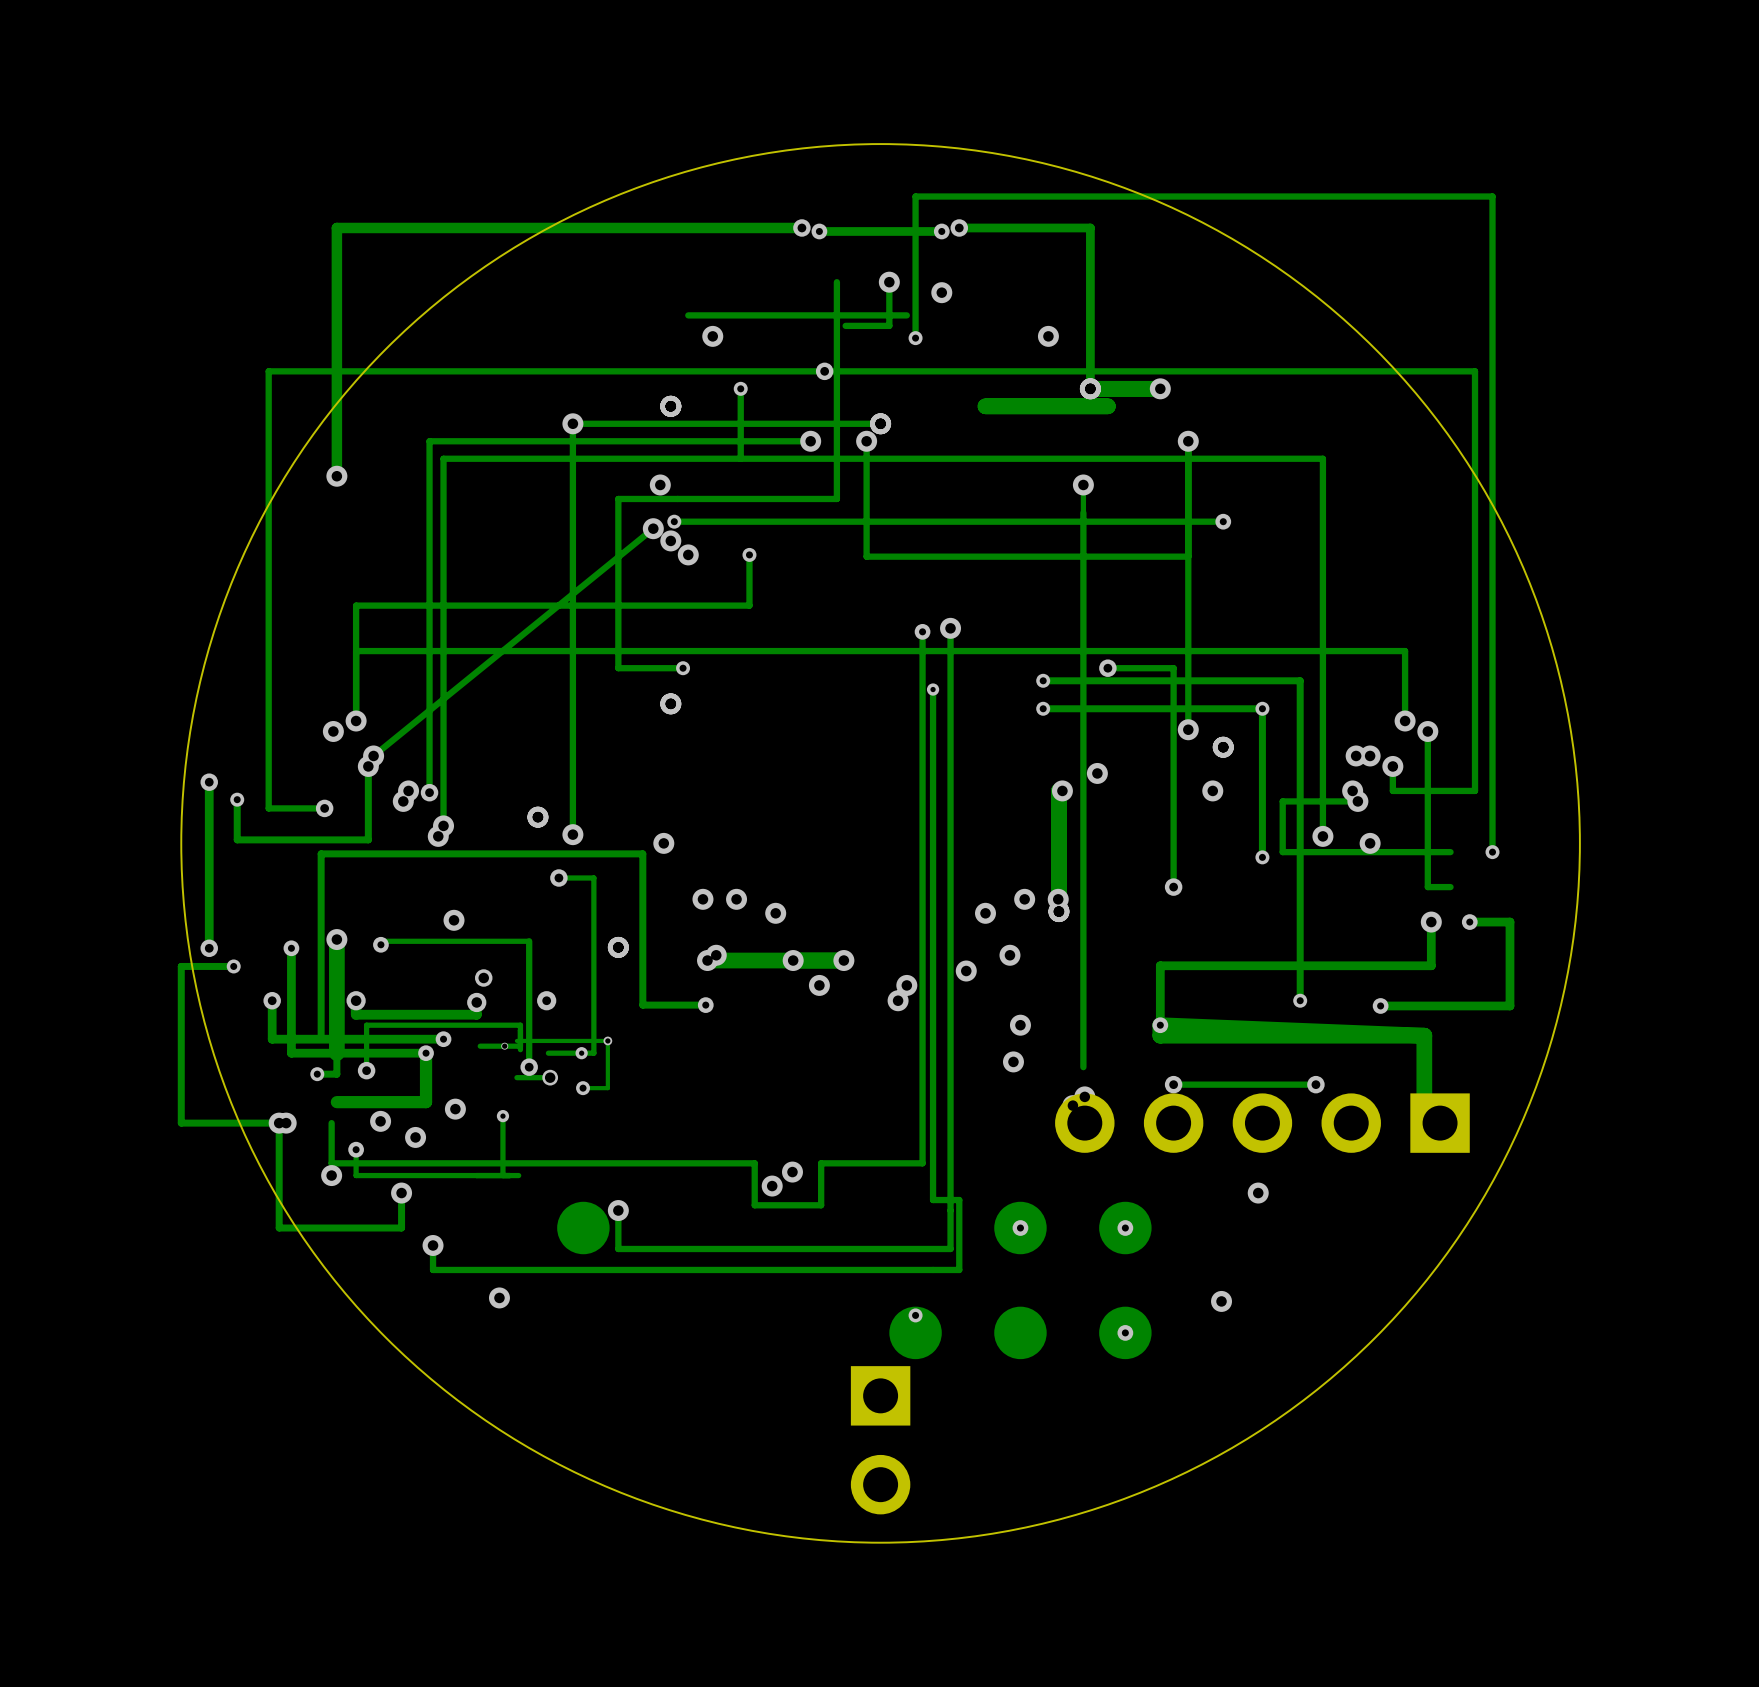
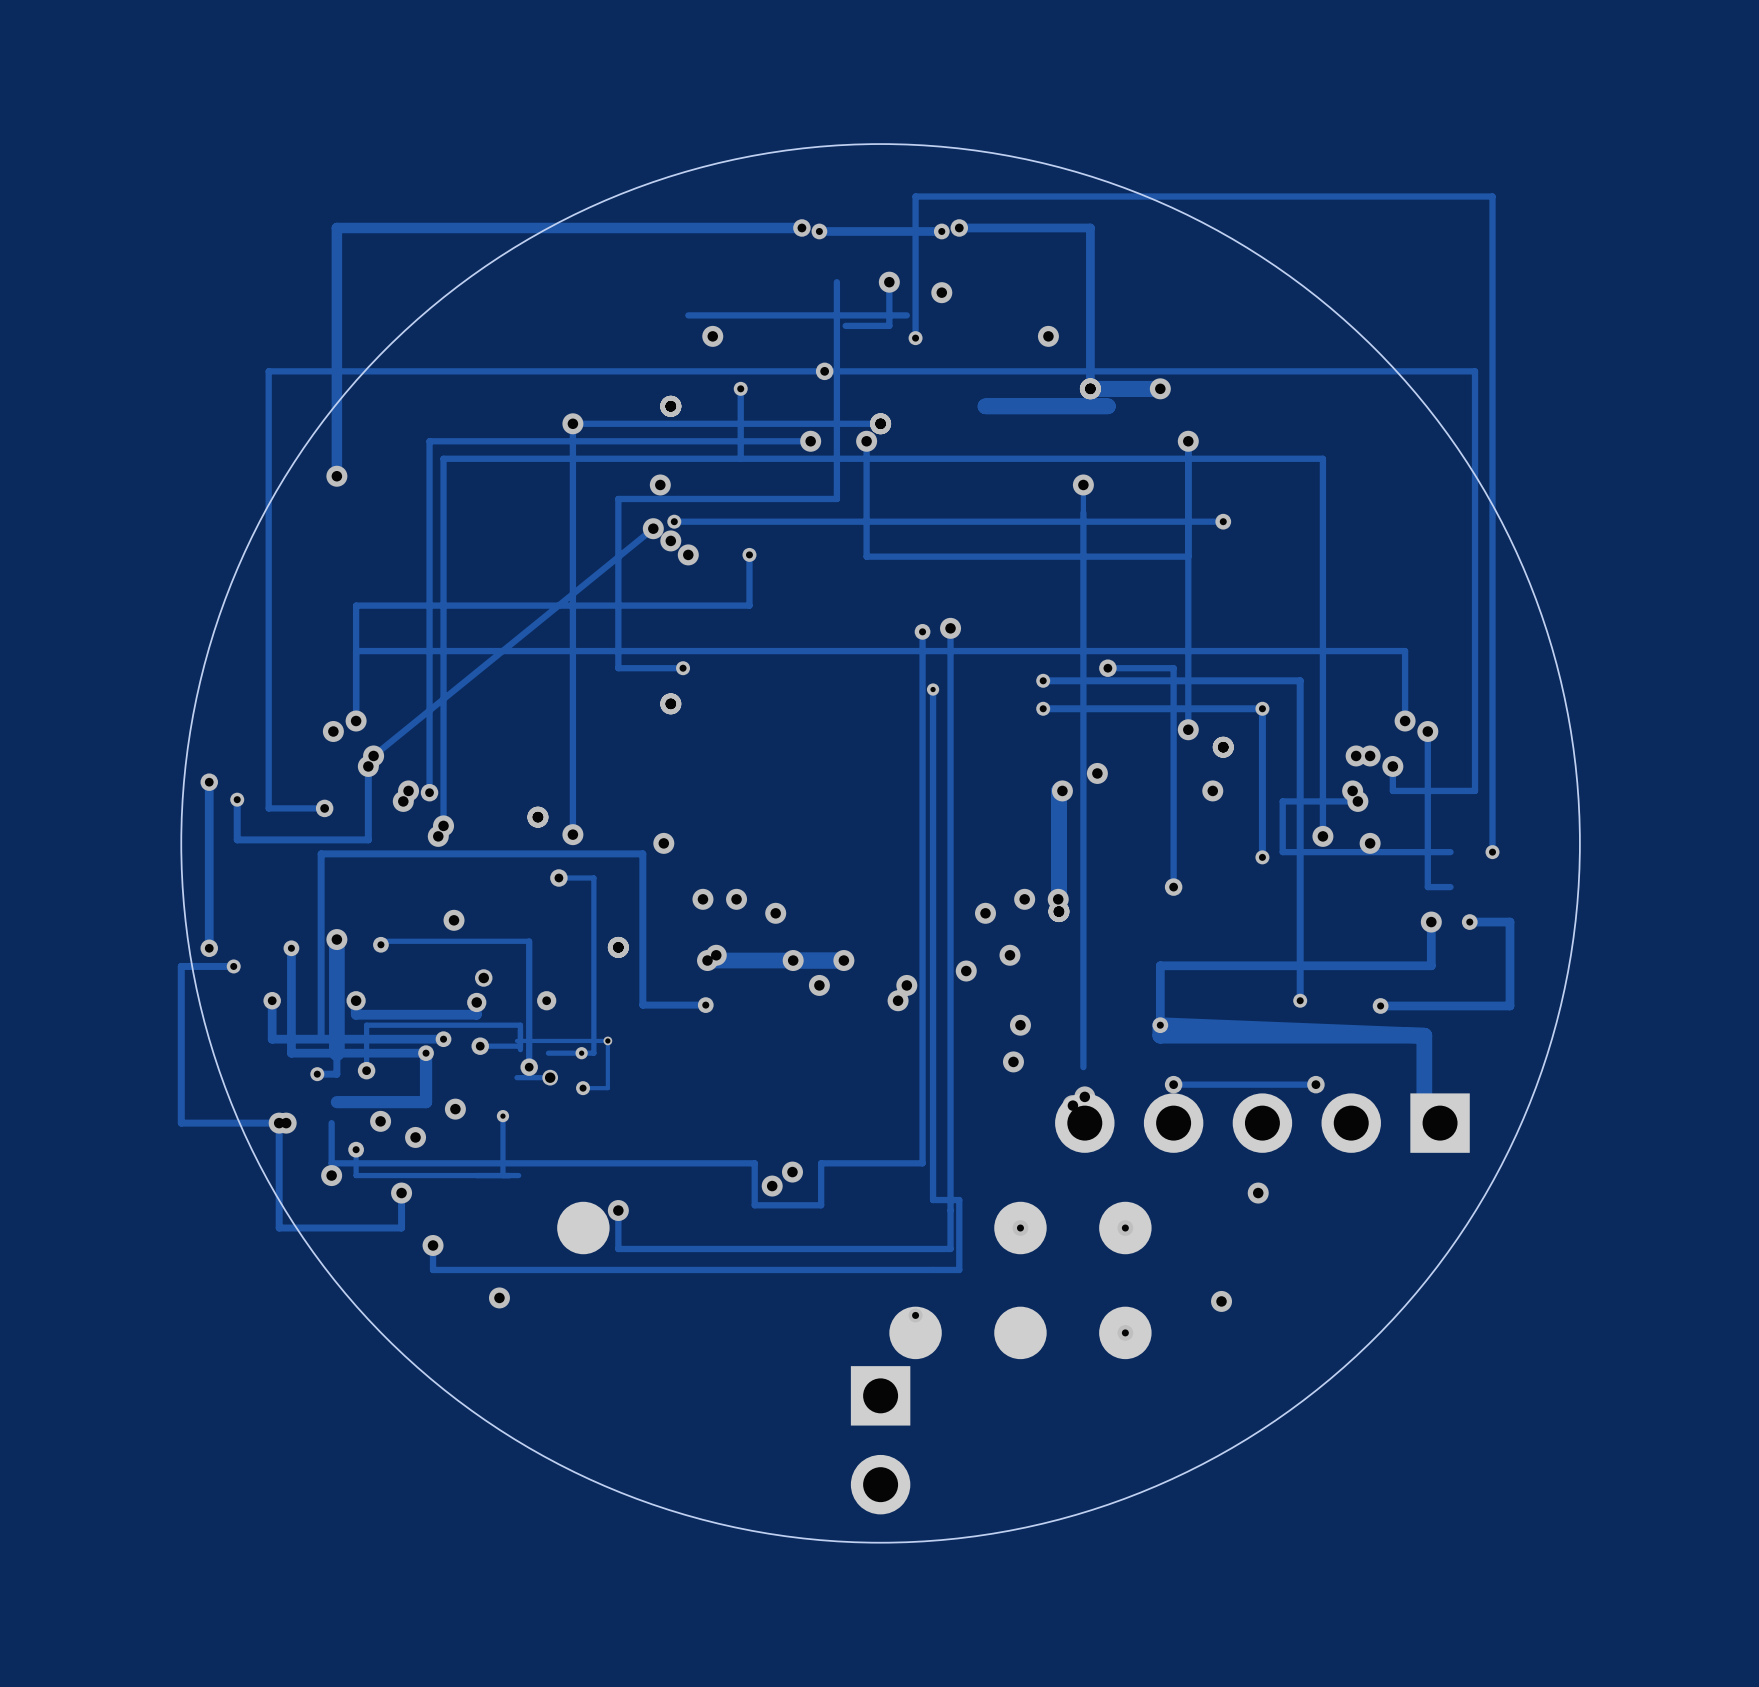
via: none -> (480, 1046)
via: (504, 1046) -> none

